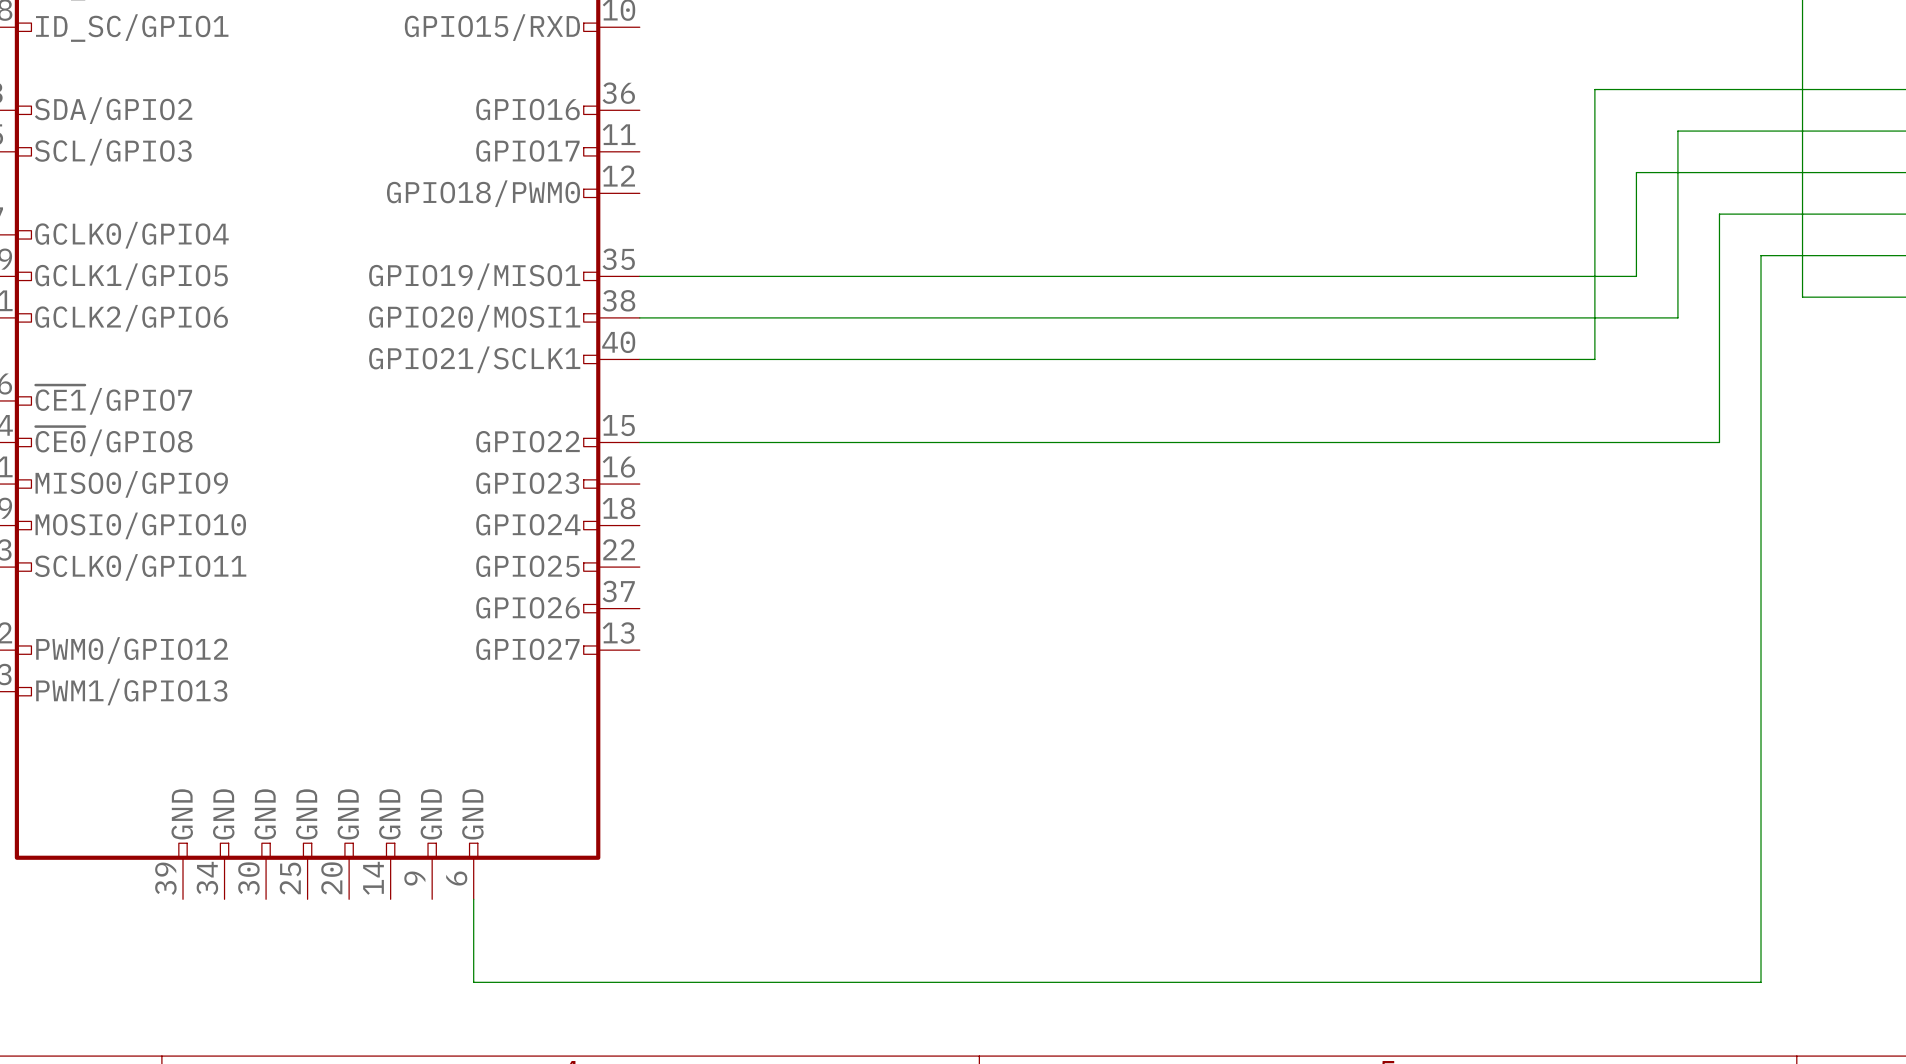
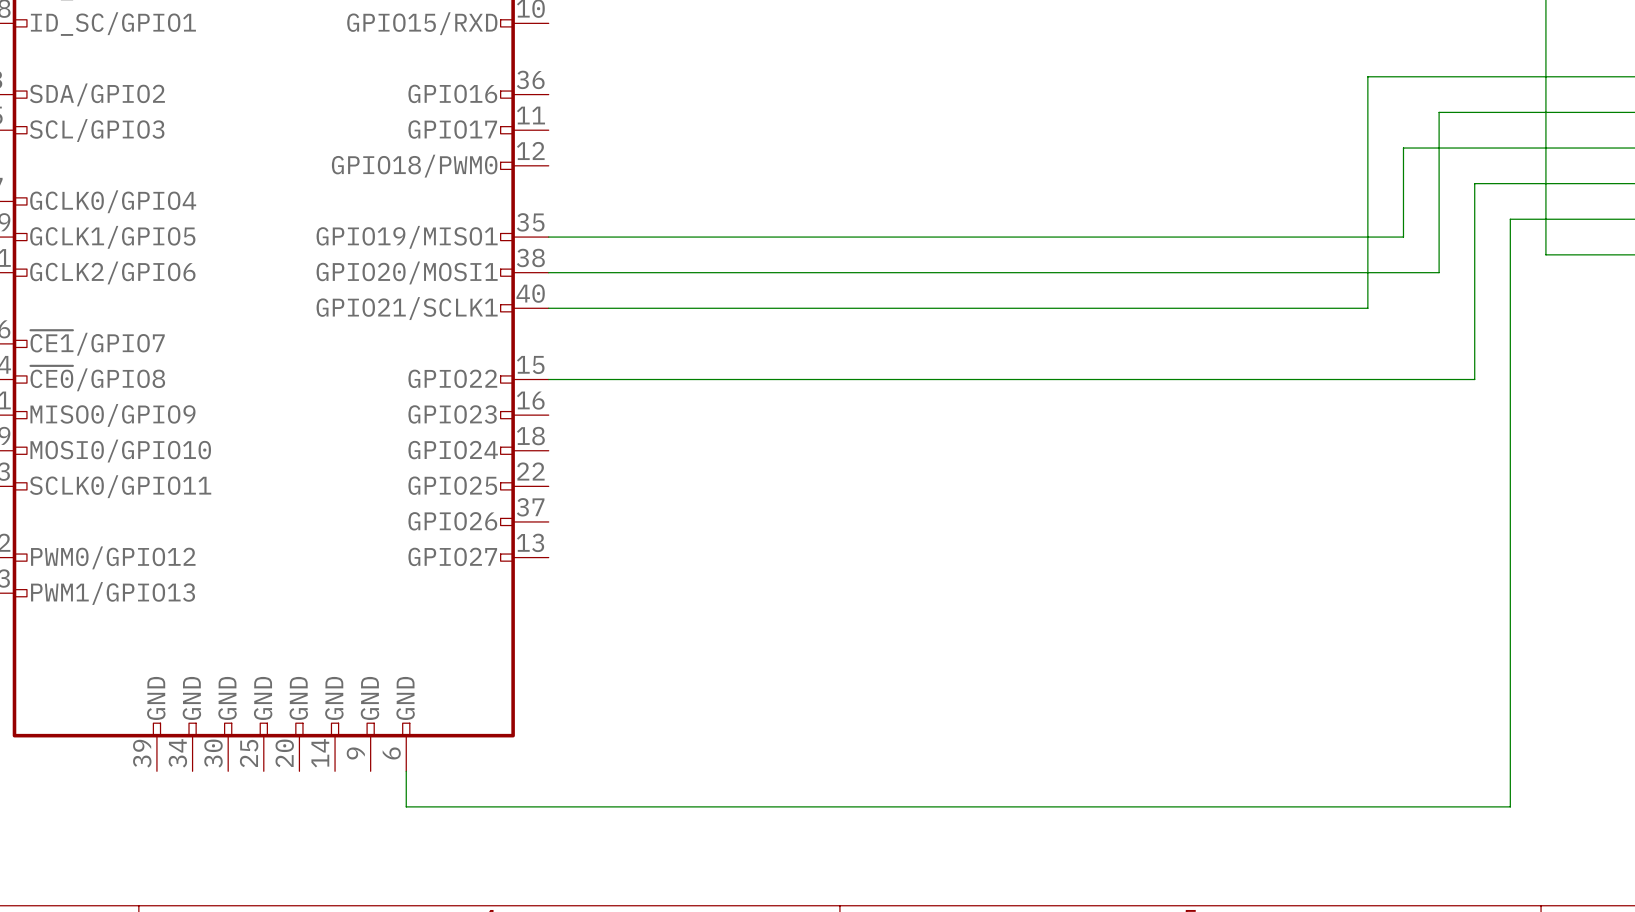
wire: (473, 940) (473, 982) (1761, 982) (1761, 940) -> (406, 806) (1510, 806)

